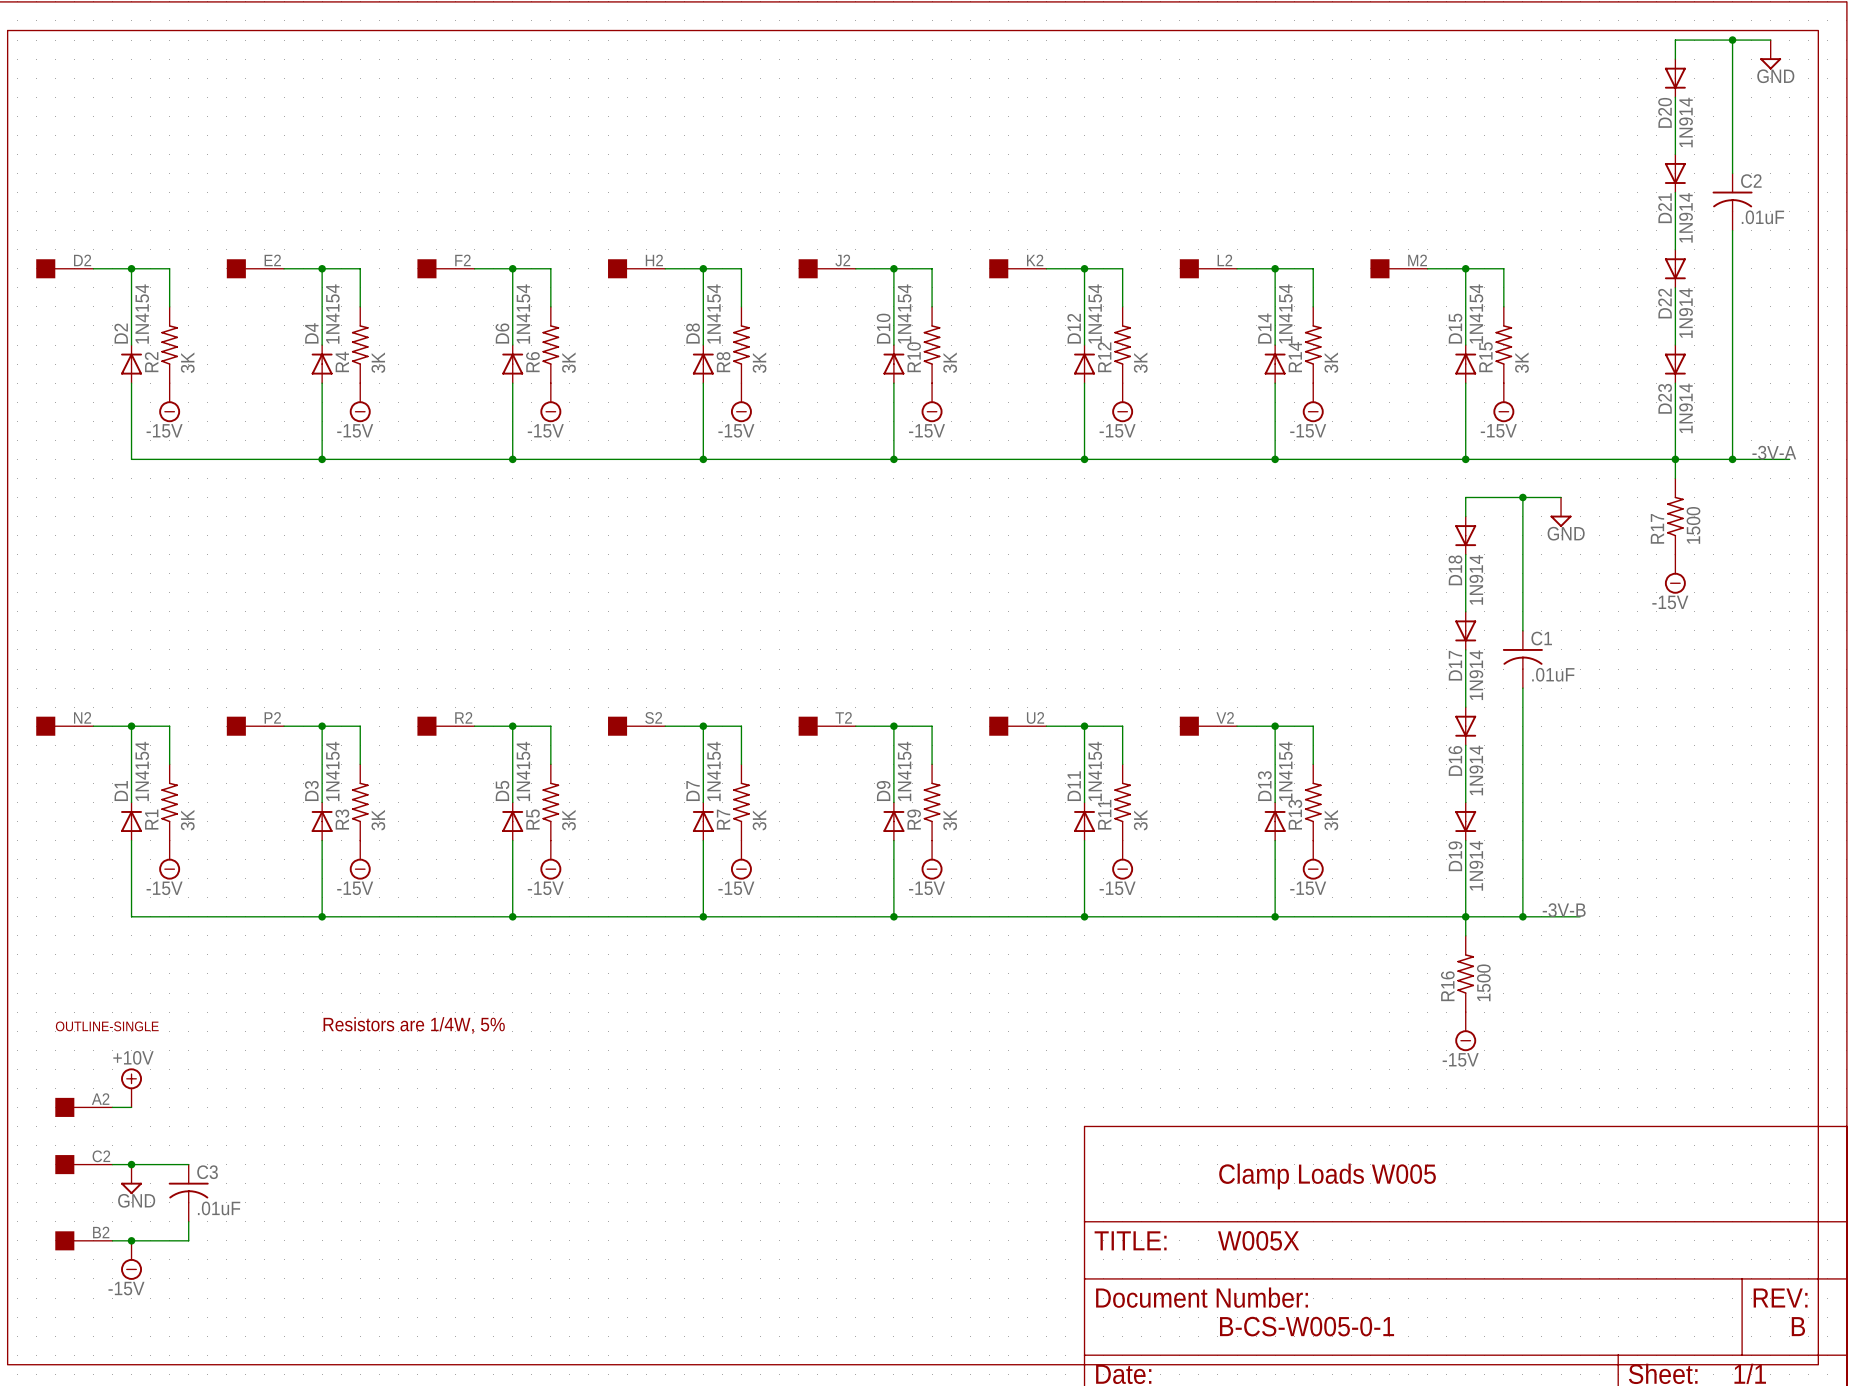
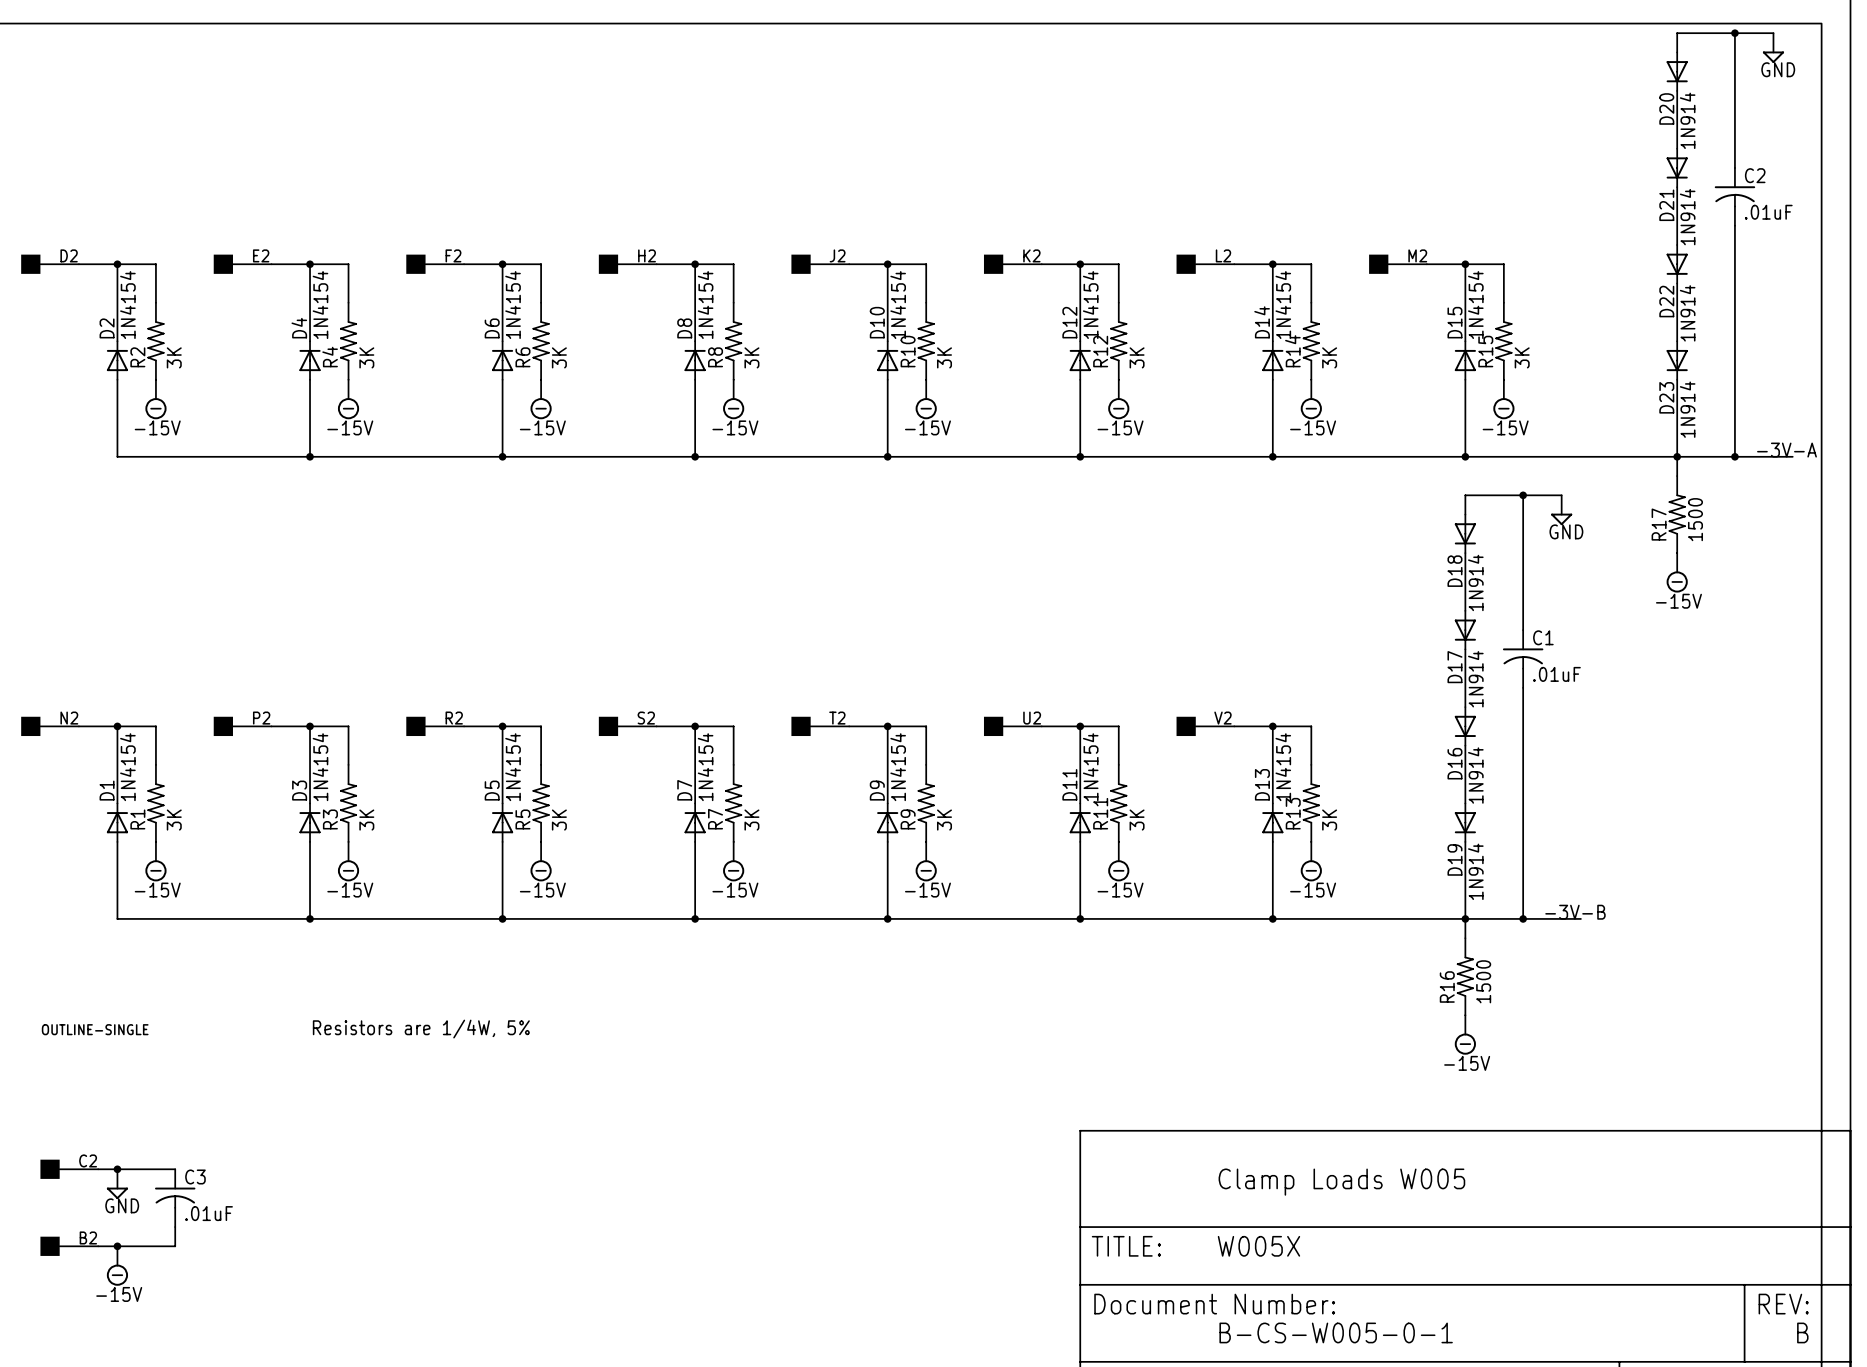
power symbol: +10V (131, 1087) -> none
part: (83, 1107) -> none
wire: (112, 1107) (131, 1107) -> none

